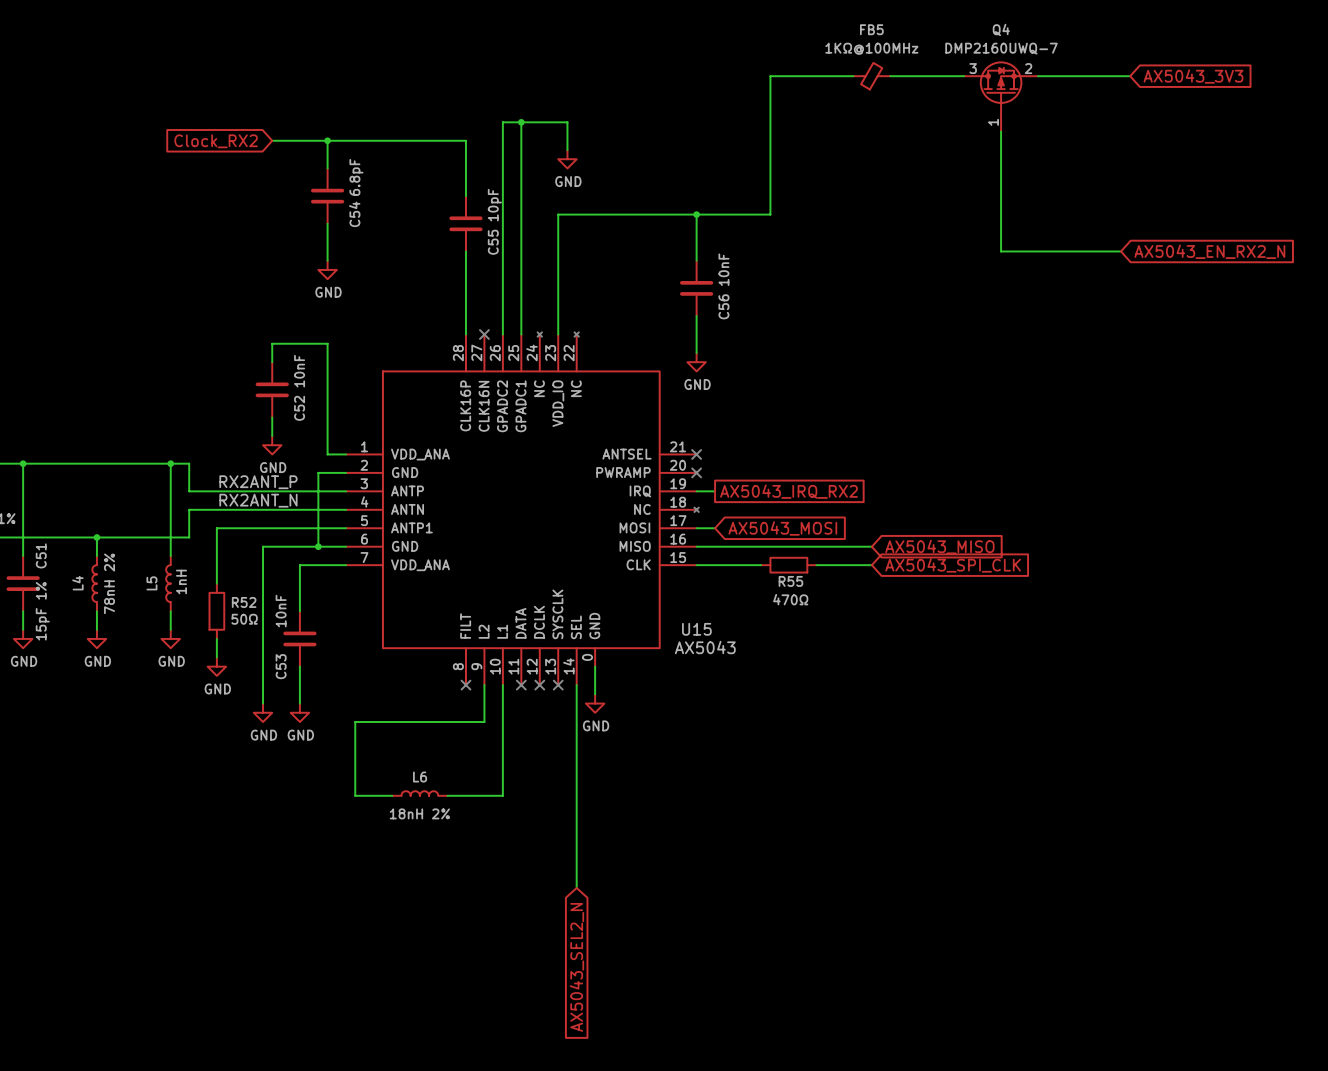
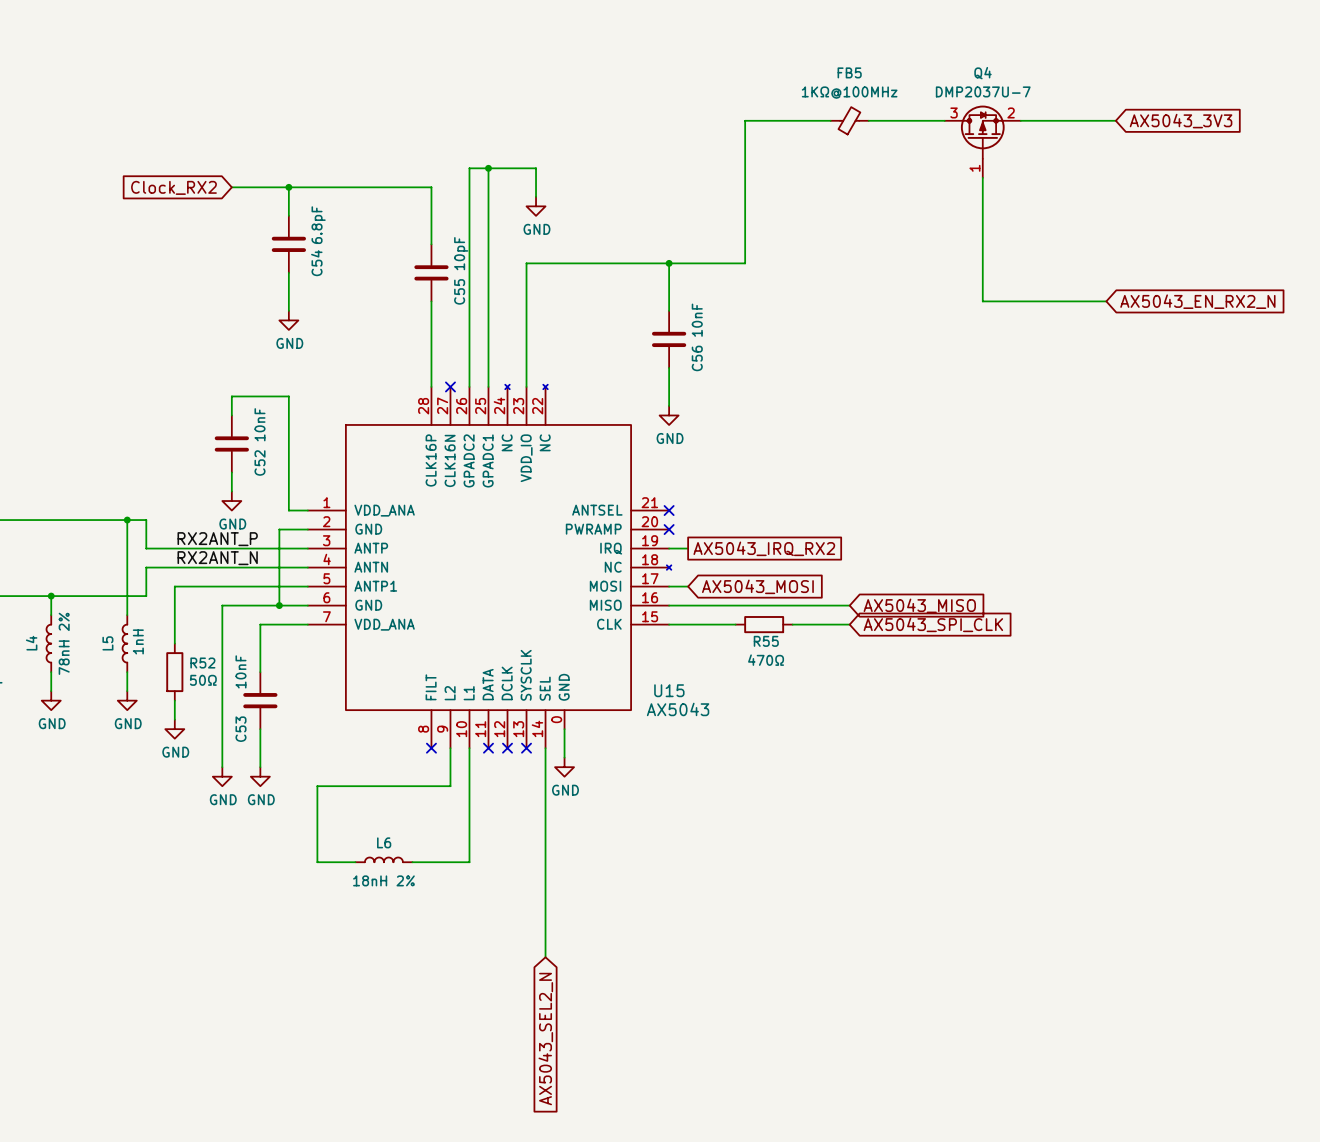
Q4 value: DMP2160UWQ-7 (1001, 48) -> DMP2037U-7 (983, 91)

